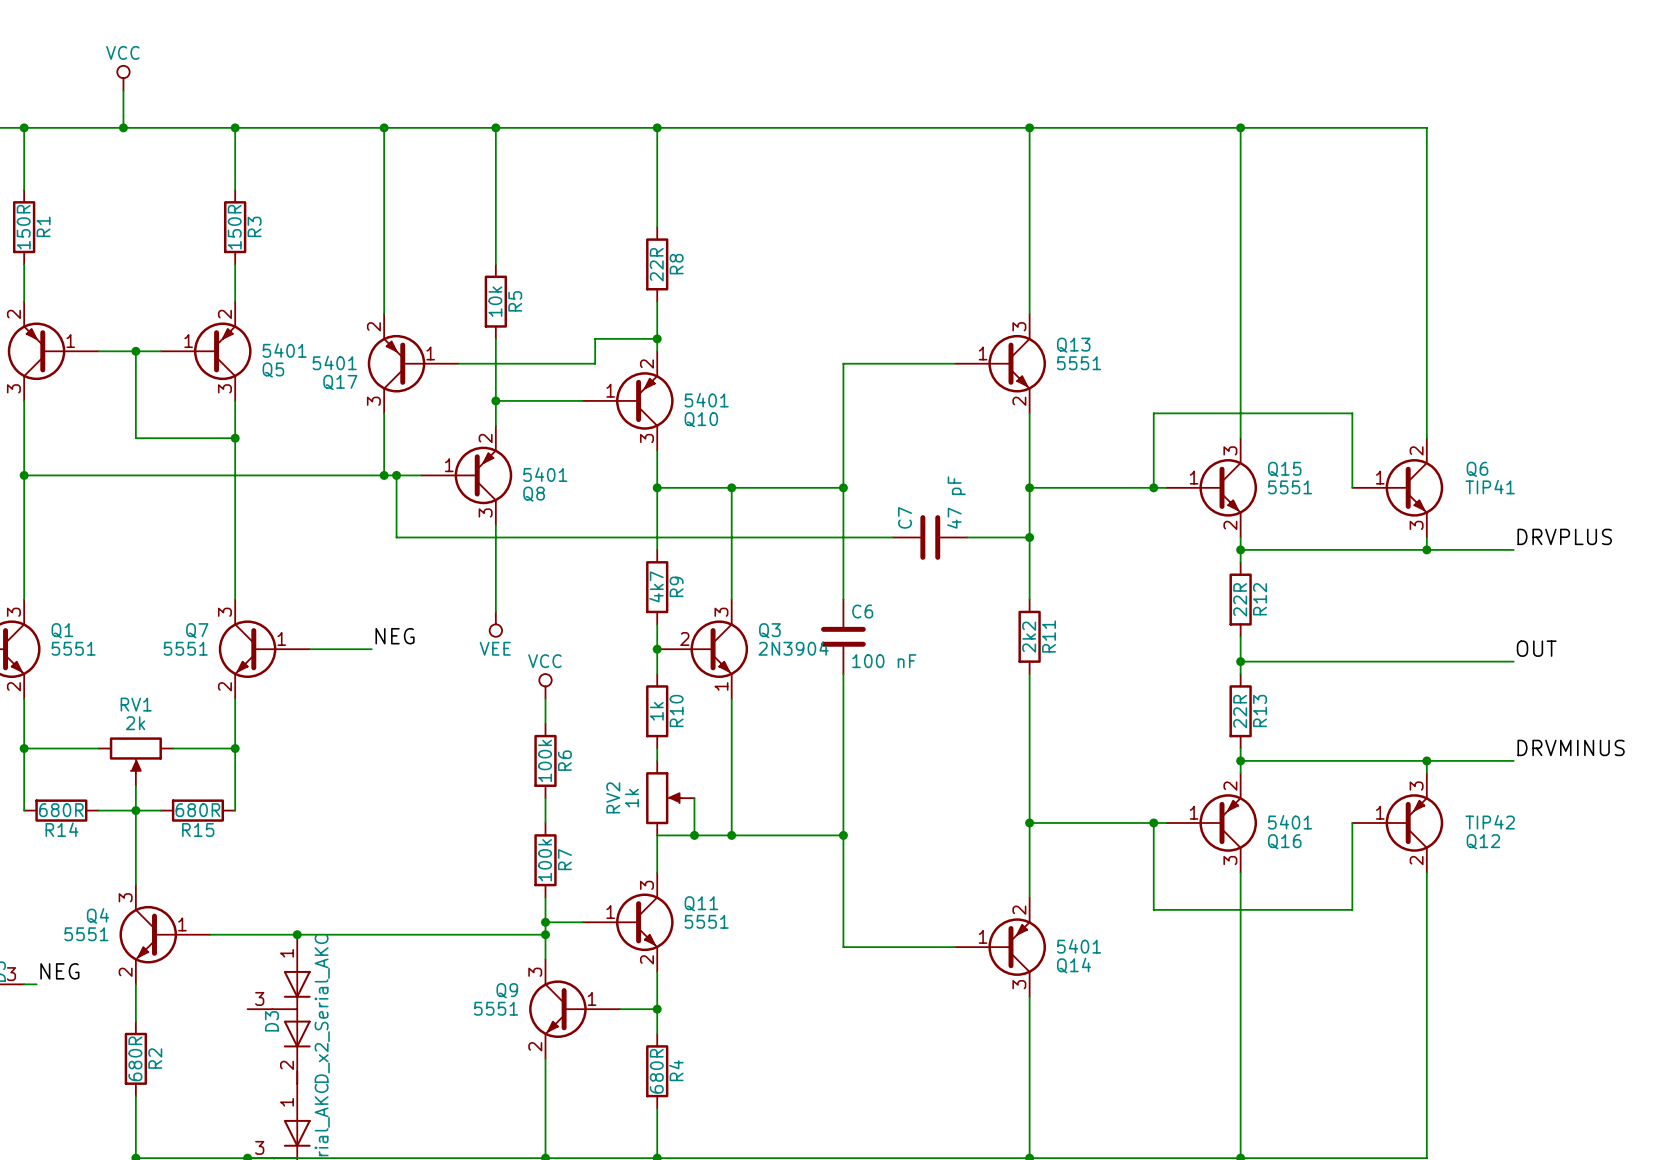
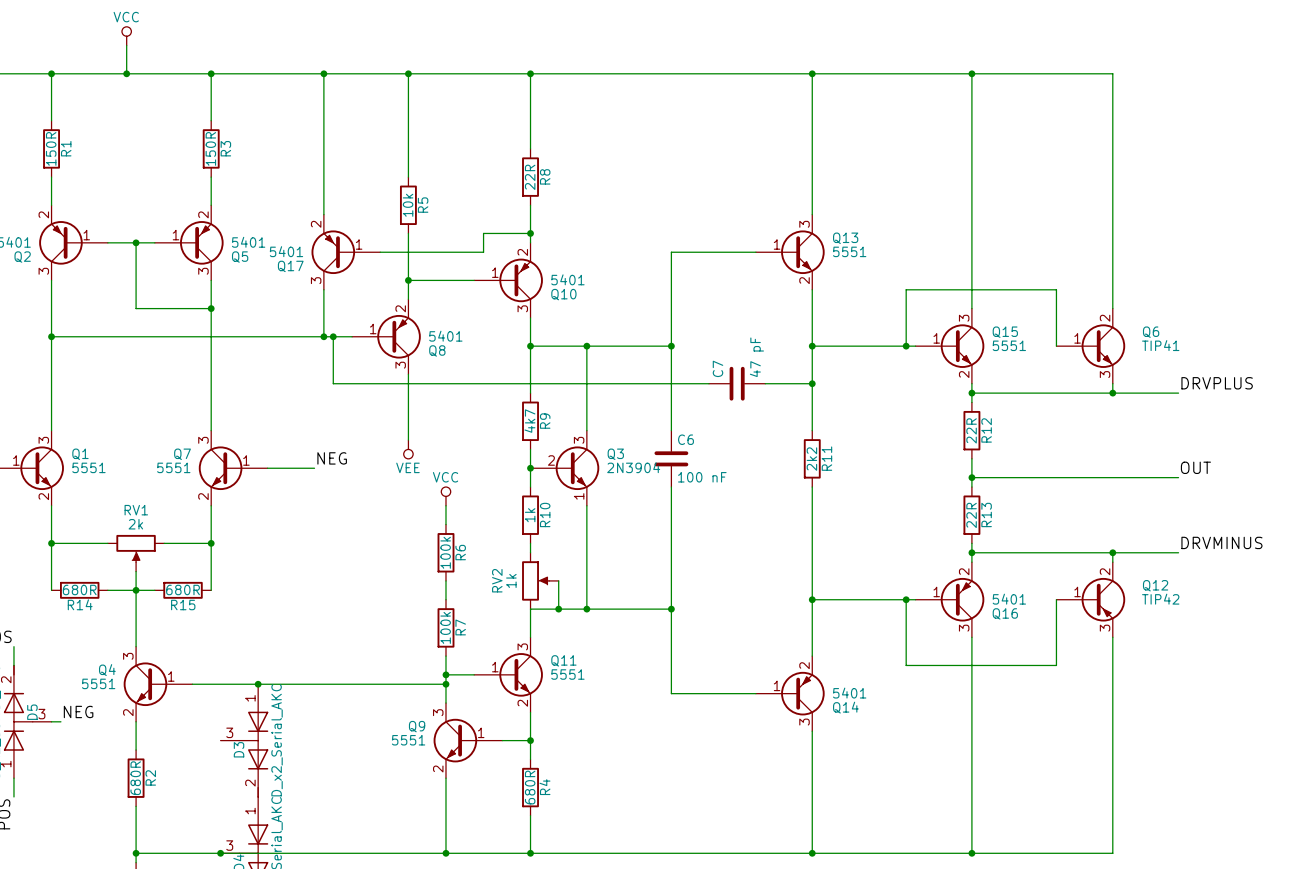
Q12 flip: as is (1414, 822) -> up-down (1103, 599)

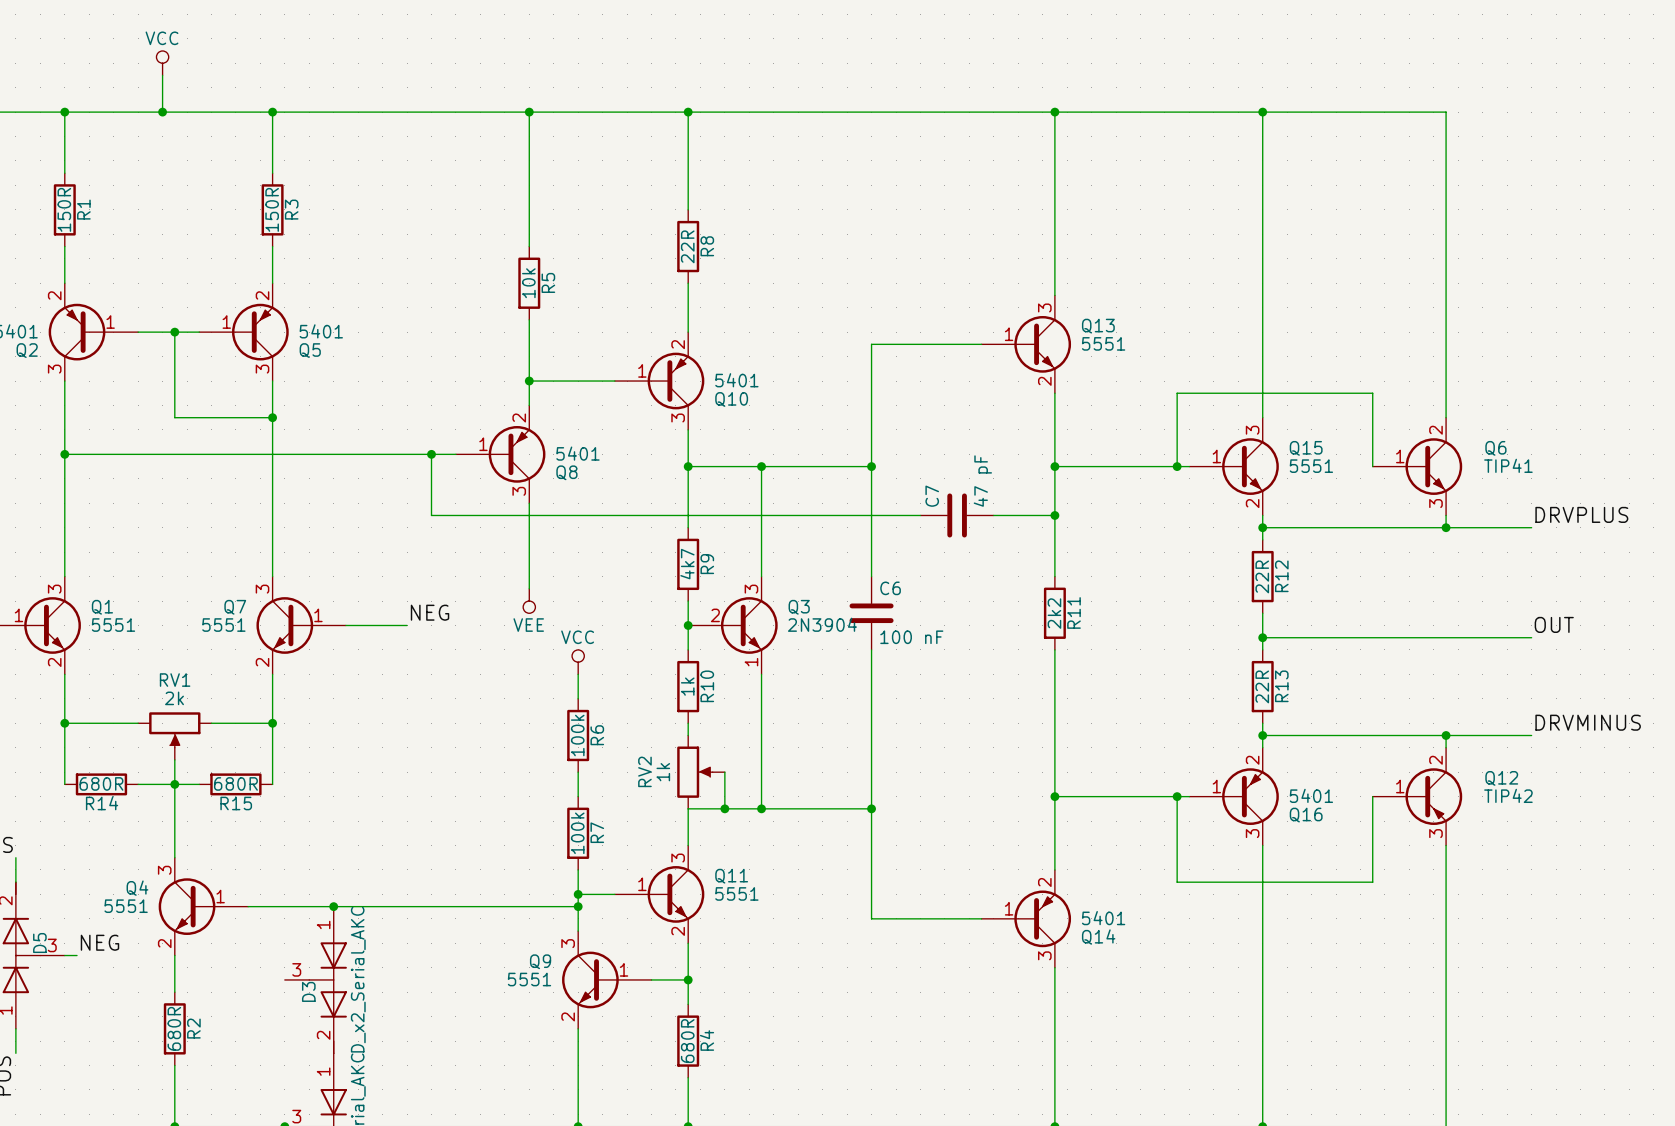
wire: (323, 73) (323, 214) -> none
junction: (323, 73) -> none
wire: (530, 233) (483, 233) (483, 252) (380, 252) -> none
junction: (530, 233) -> none
Q17: 5401 (345, 252) -> none
wire: (323, 289) (323, 336) -> none
junction: (323, 336) -> none

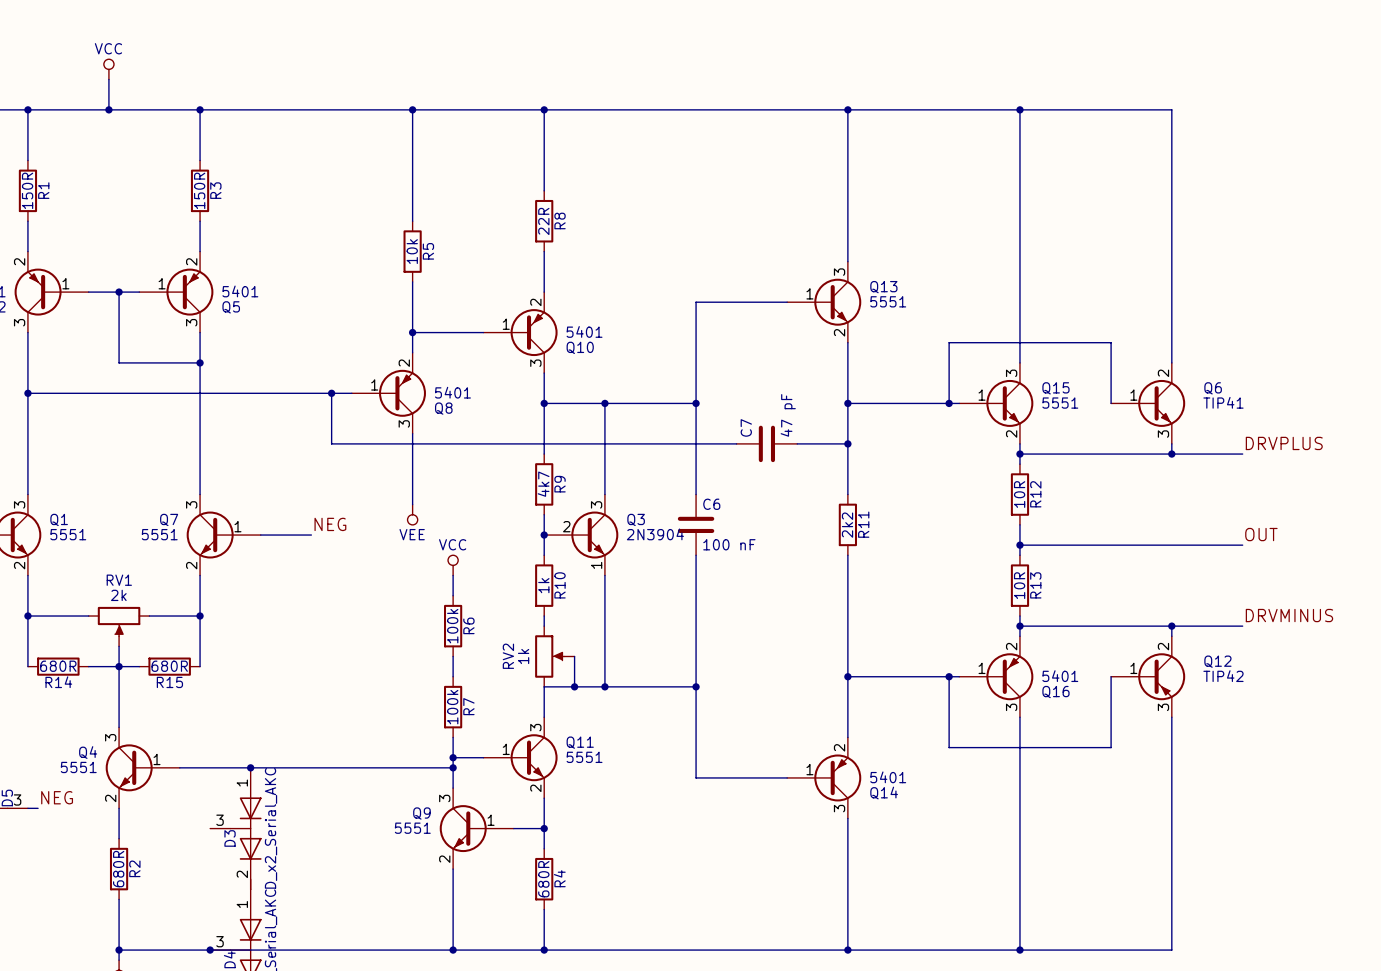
R12 value: 22R (1262, 576) -> 10R (1019, 494)
R13 value: 22R (1262, 686) -> 10R (1019, 585)

